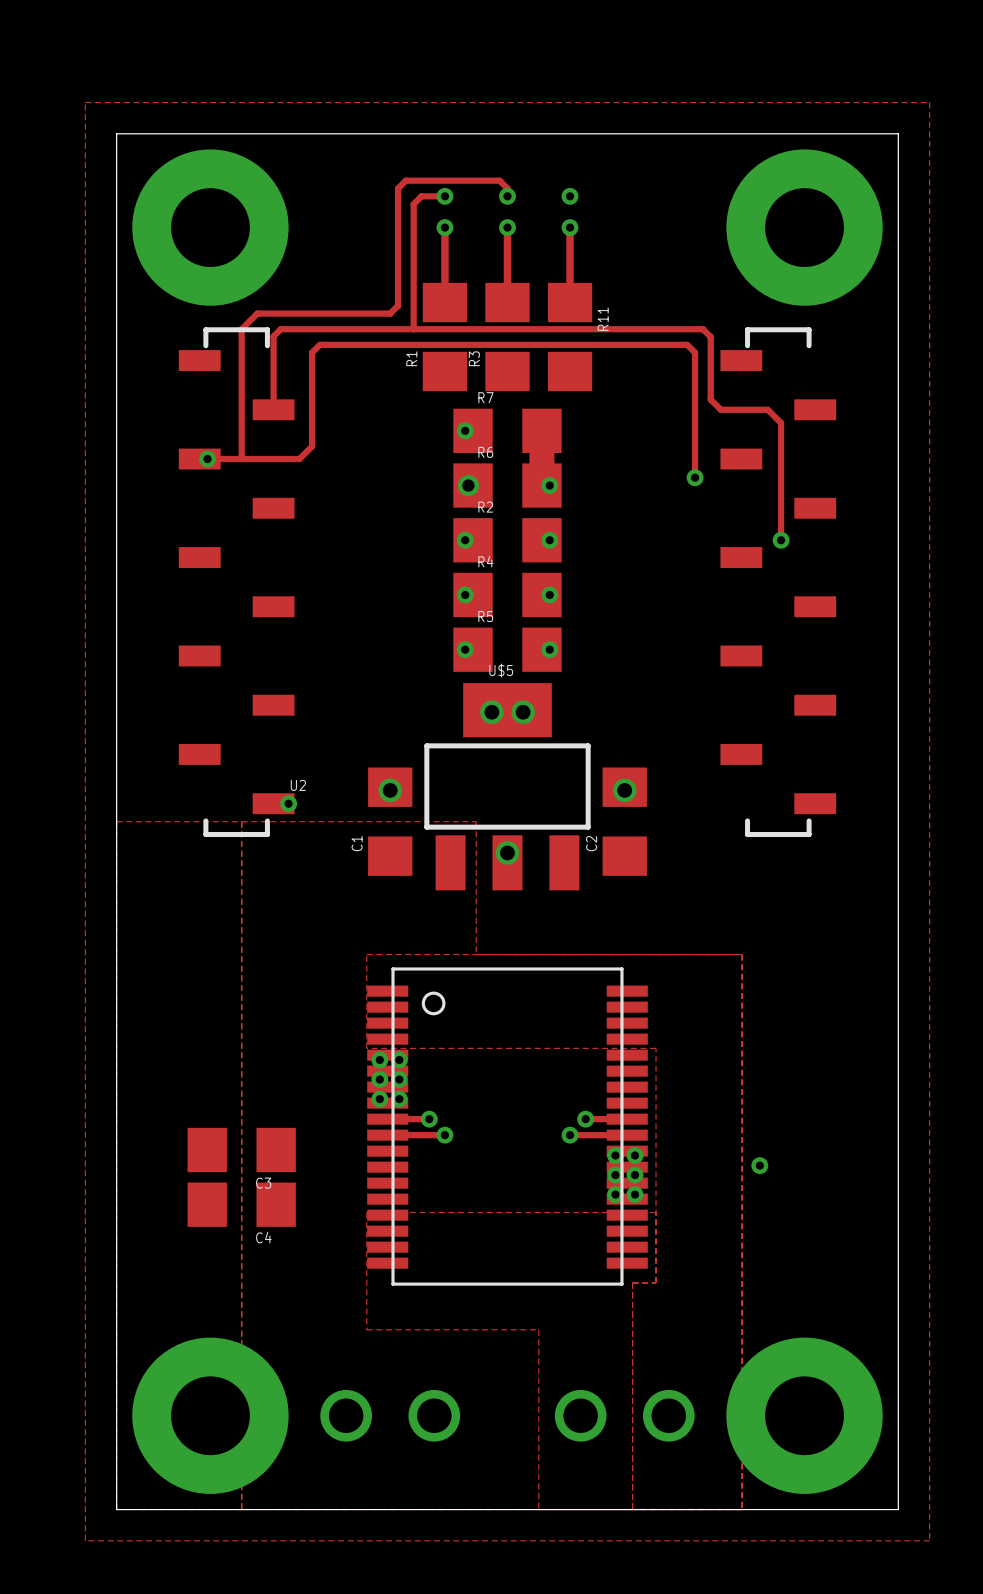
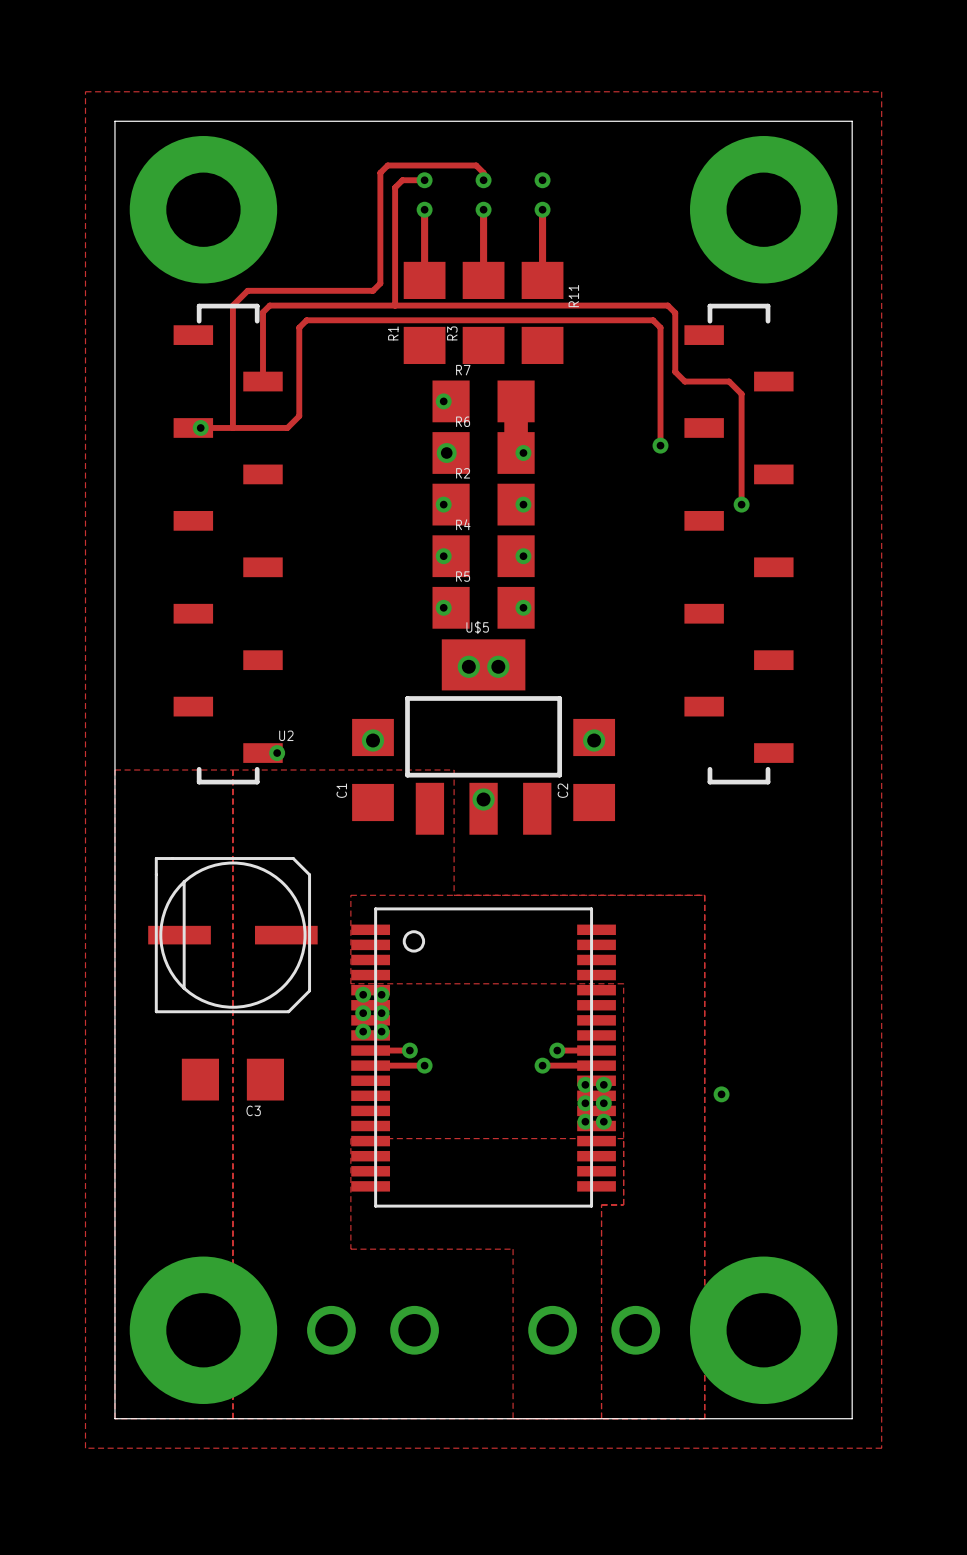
part: none -> (232, 935)
C4: (241, 1204) -> none

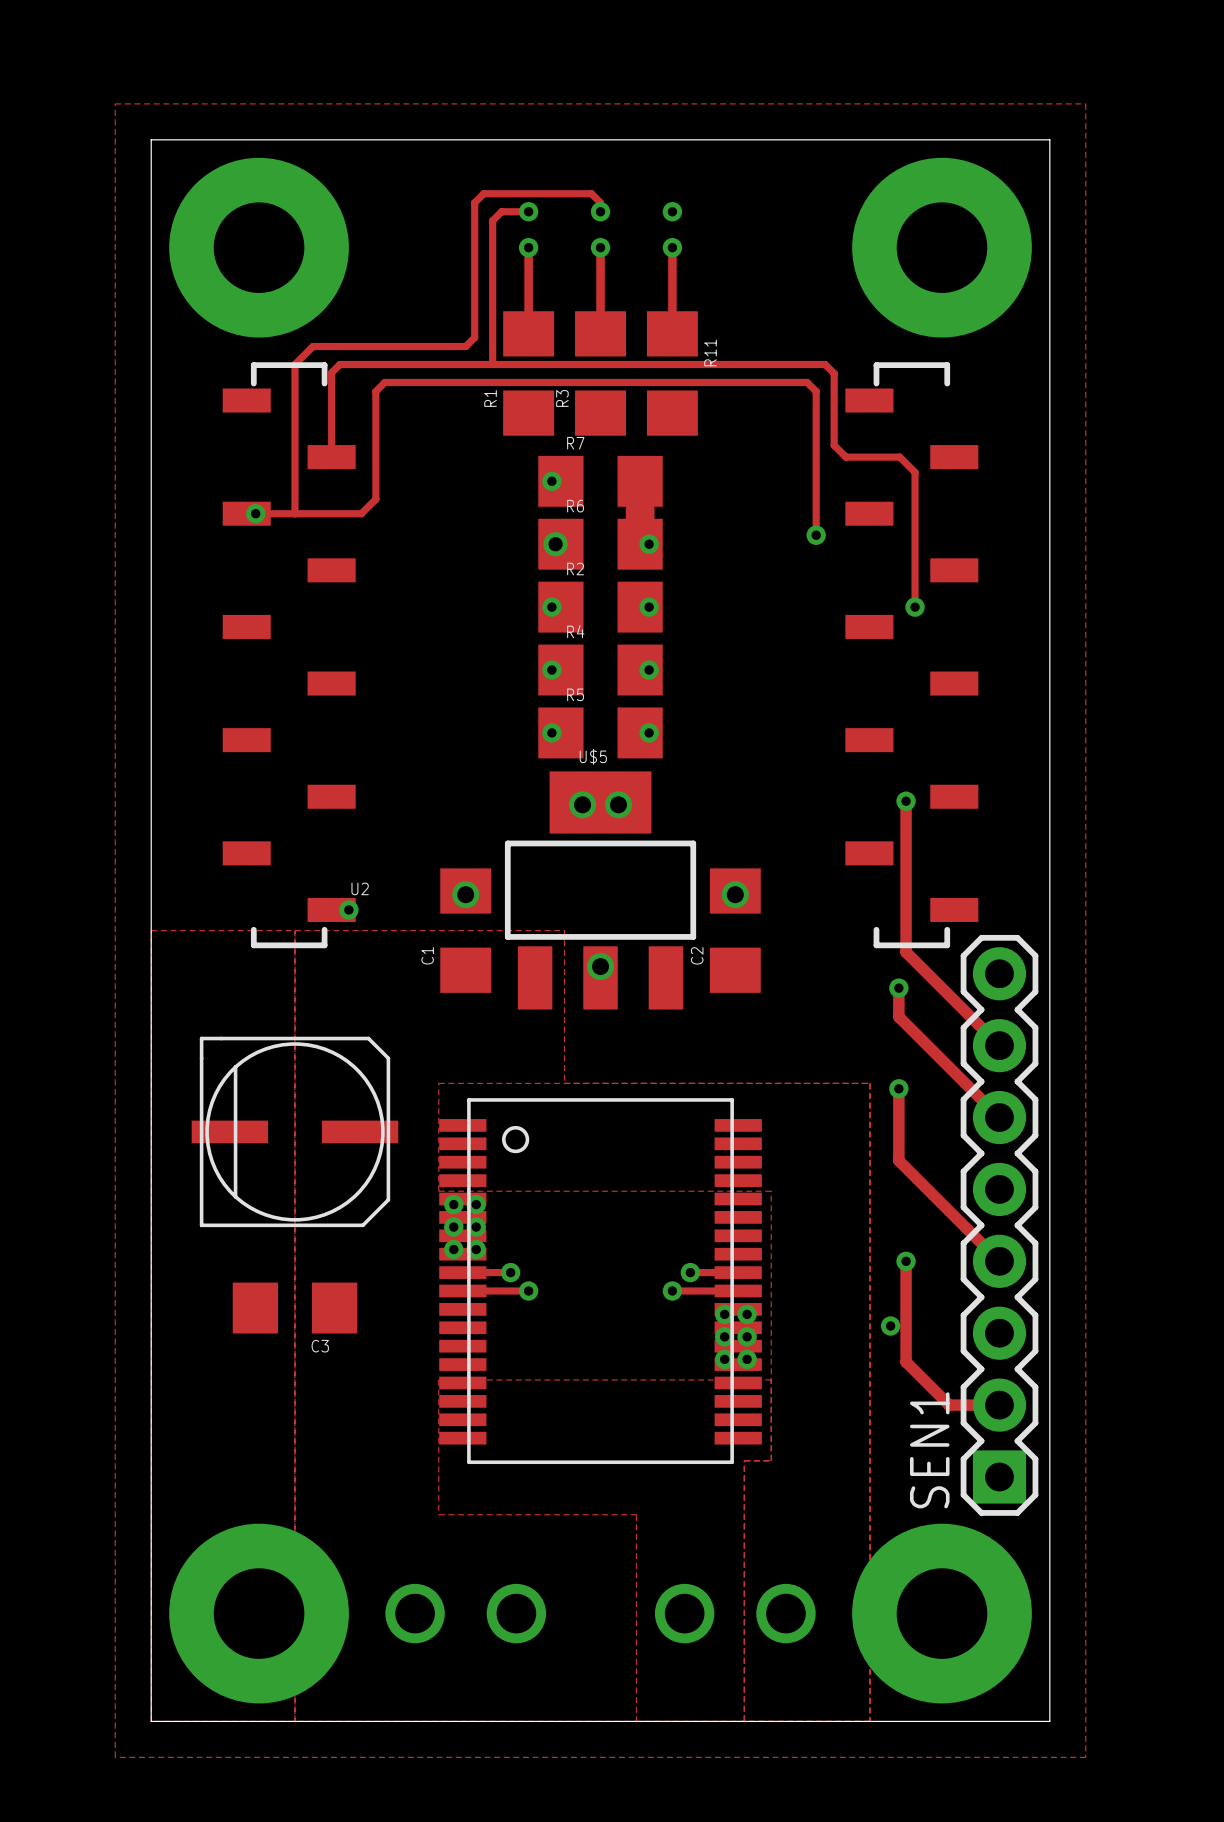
track: none -> (906, 801) (906, 952) (999, 1045)
via: none -> (906, 801)
track: none -> (898, 988) (898, 1016) (999, 1117)
via: none -> (898, 988)
track: none -> (898, 1088) (898, 1160) (999, 1261)
via: none -> (898, 1088)
SEN1: none -> (999, 1225)
track: none -> (906, 1261) (906, 1361) (949, 1405) (999, 1405)
via: none -> (906, 1261)

